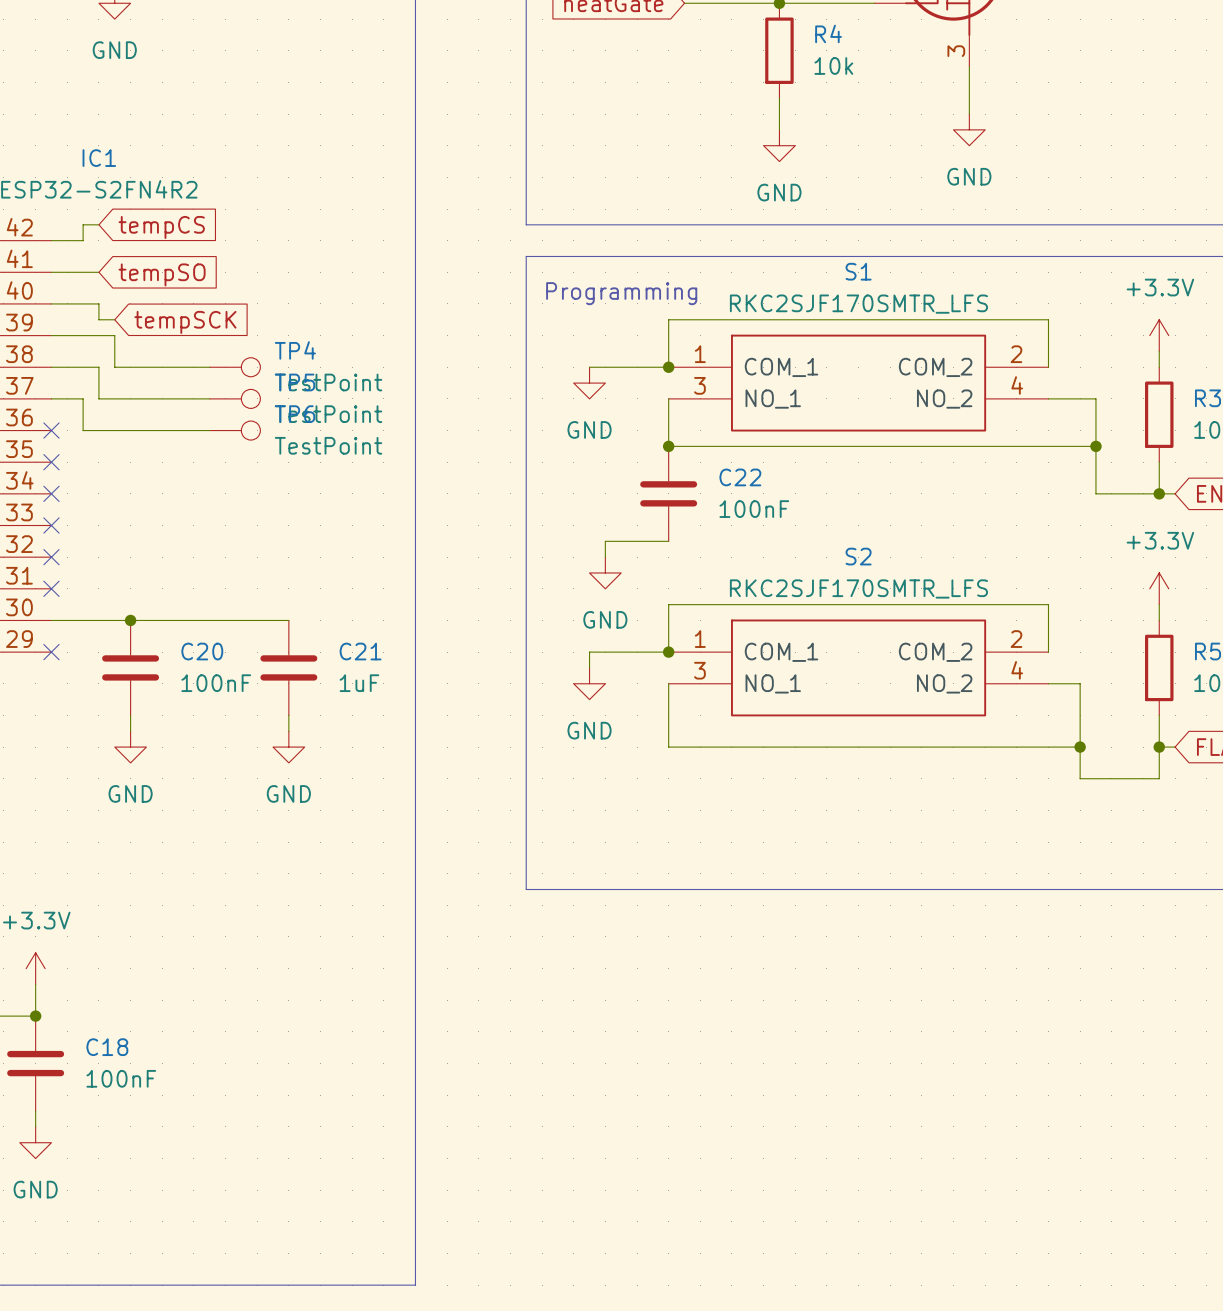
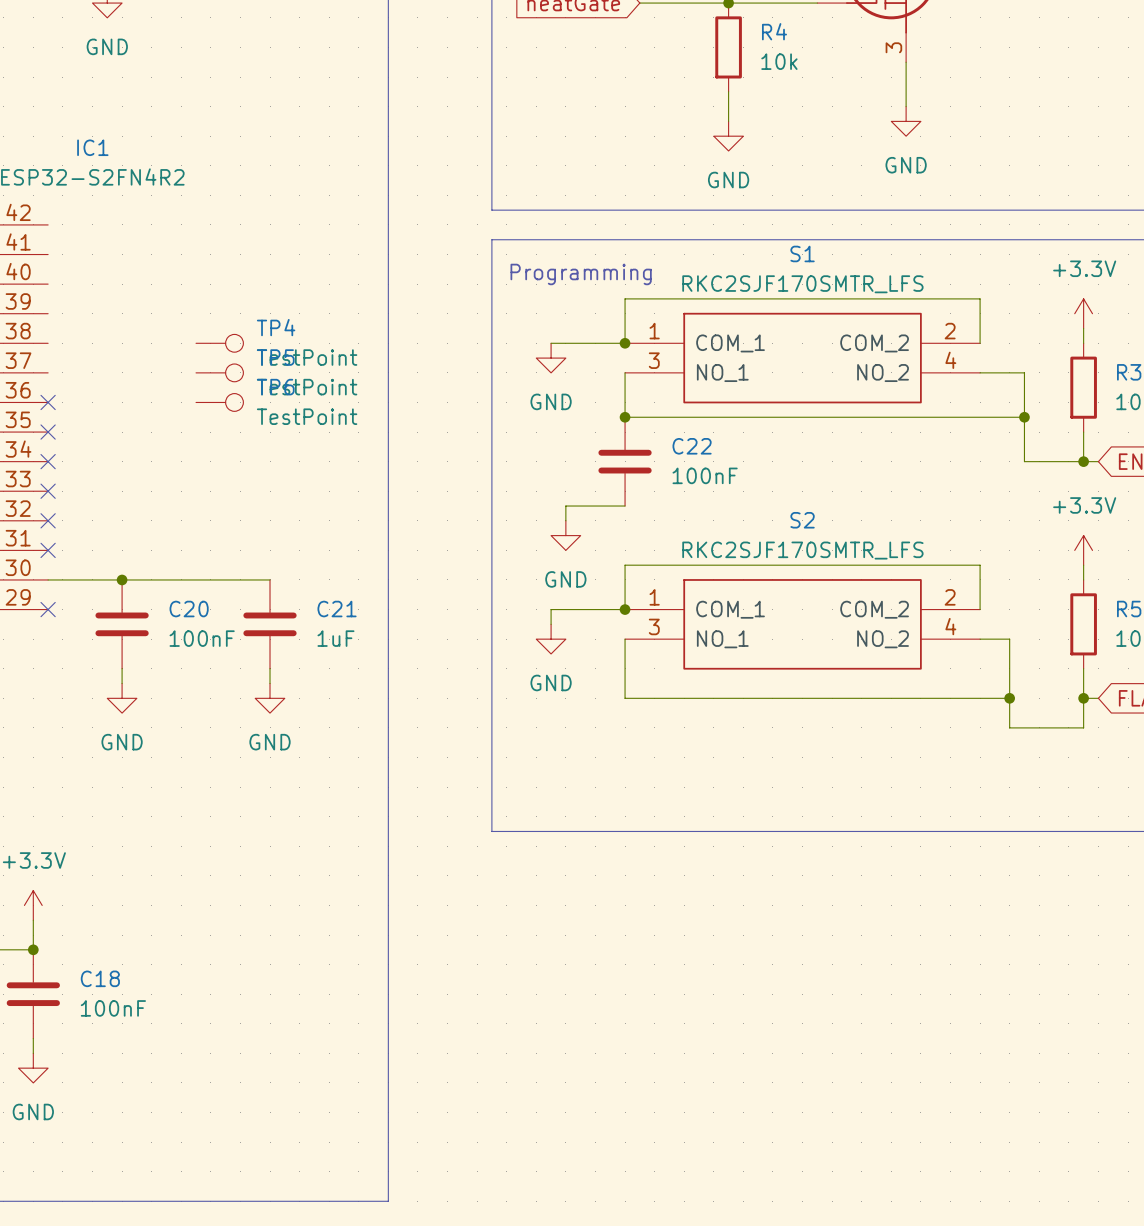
wire: (98, 224) (83, 224) (83, 240) (51, 240) -> none
global label: tempCS (161, 227) -> none
wire: (51, 272) (98, 272) -> none
global label: tempSO (162, 274) -> none
wire: (51, 303) (98, 303) (98, 319) (114, 319) -> none
global label: tempSCK (185, 322) -> none
wire: (51, 335) (114, 335) (114, 367) (209, 367) -> none
wire: (51, 367) (98, 367) (98, 398) (209, 398) -> none
wire: (51, 398) (83, 398) (83, 430) (209, 430) -> none

